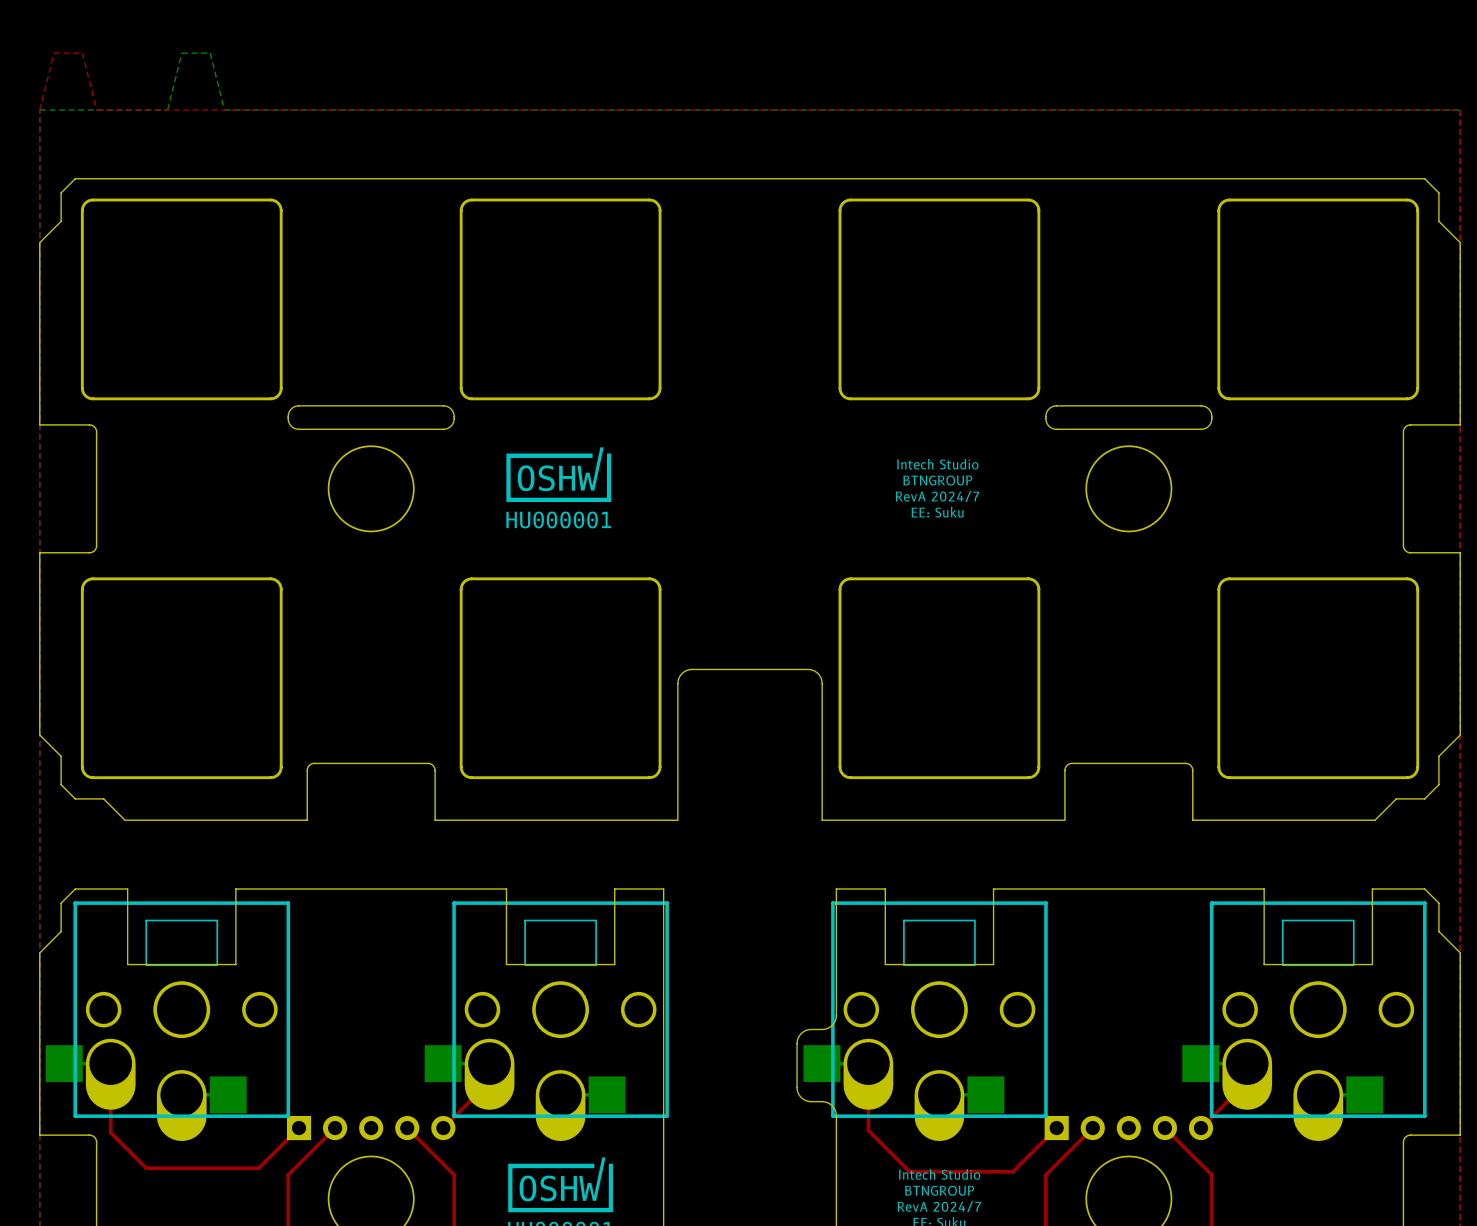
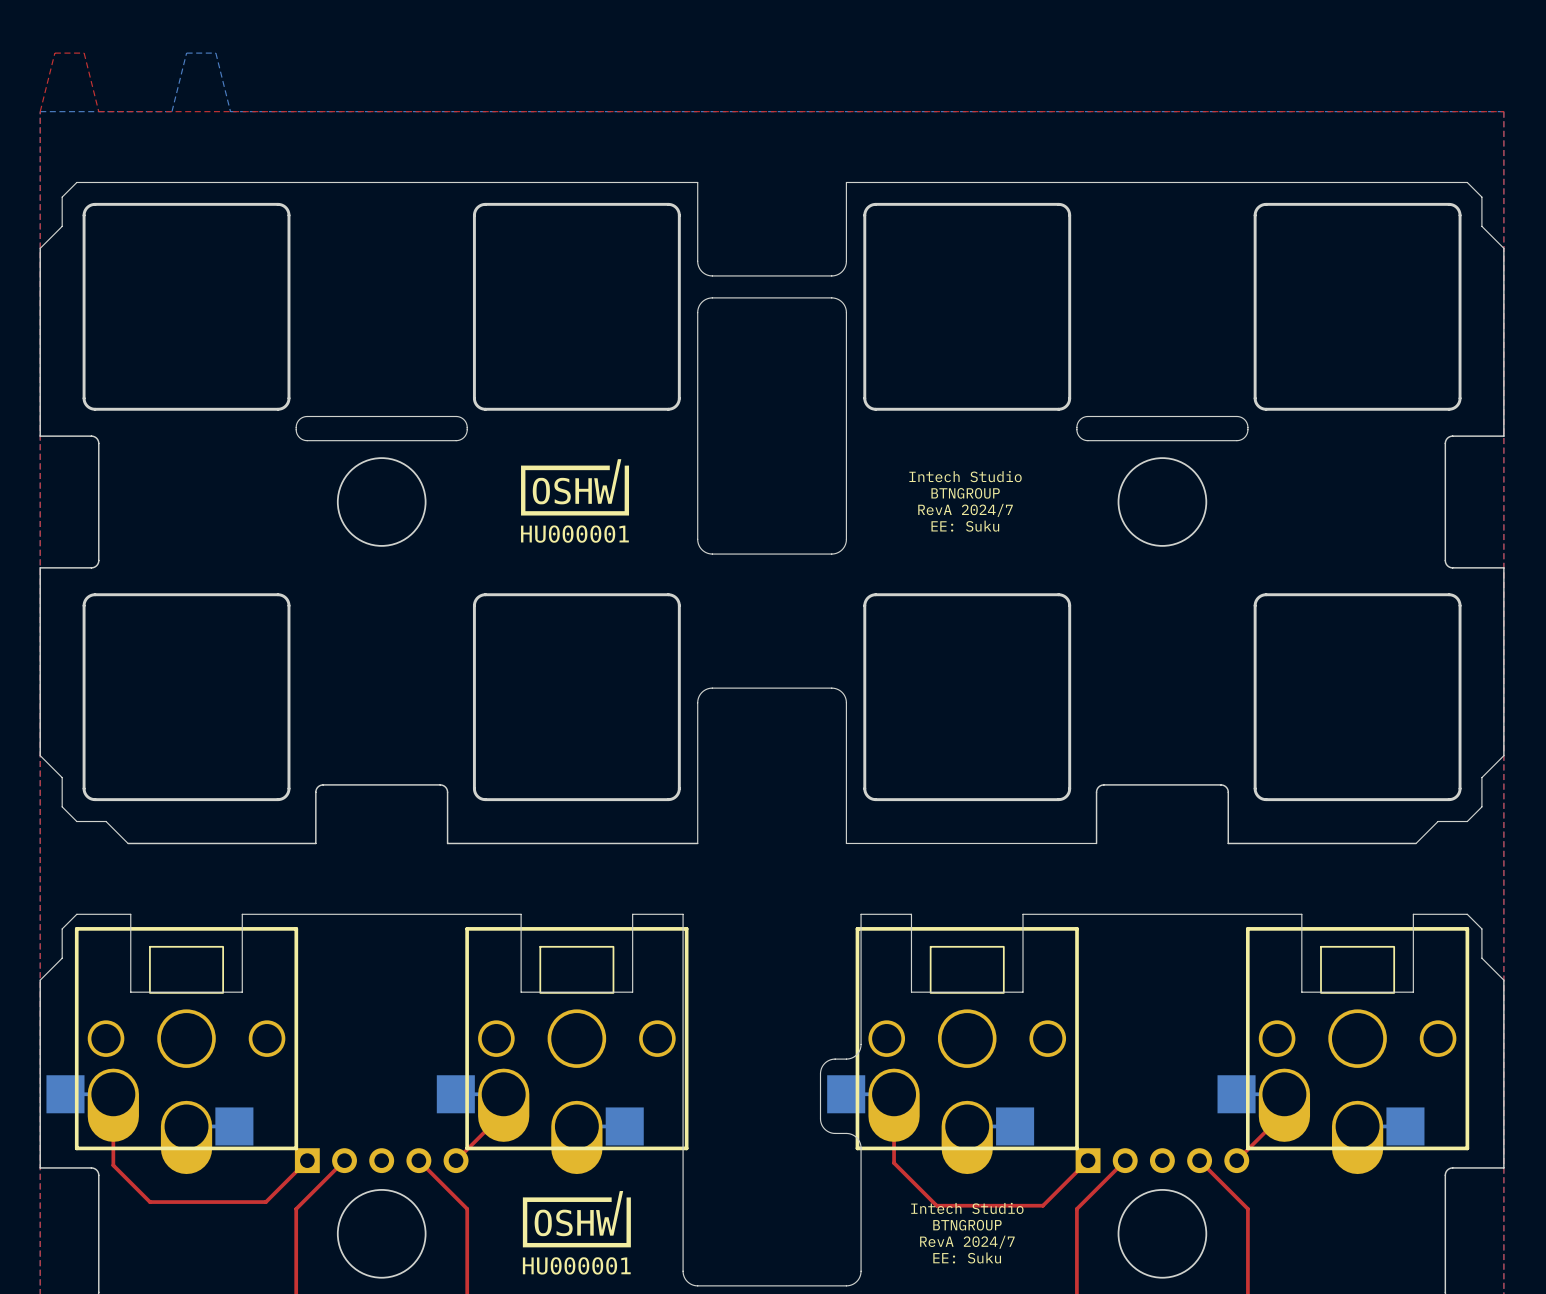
board edge: (677, 178) (822, 178) -> (697, 182) (697, 262) (701, 271) (712, 275) (831, 275) (839, 273) (846, 262) (846, 182)
board edge: none -> (712, 297) (833, 298) (840, 301) (844, 306) (846, 539) (844, 547) (838, 552) (712, 554) (704, 551) (699, 545) (697, 312) (701, 302) (712, 297)

